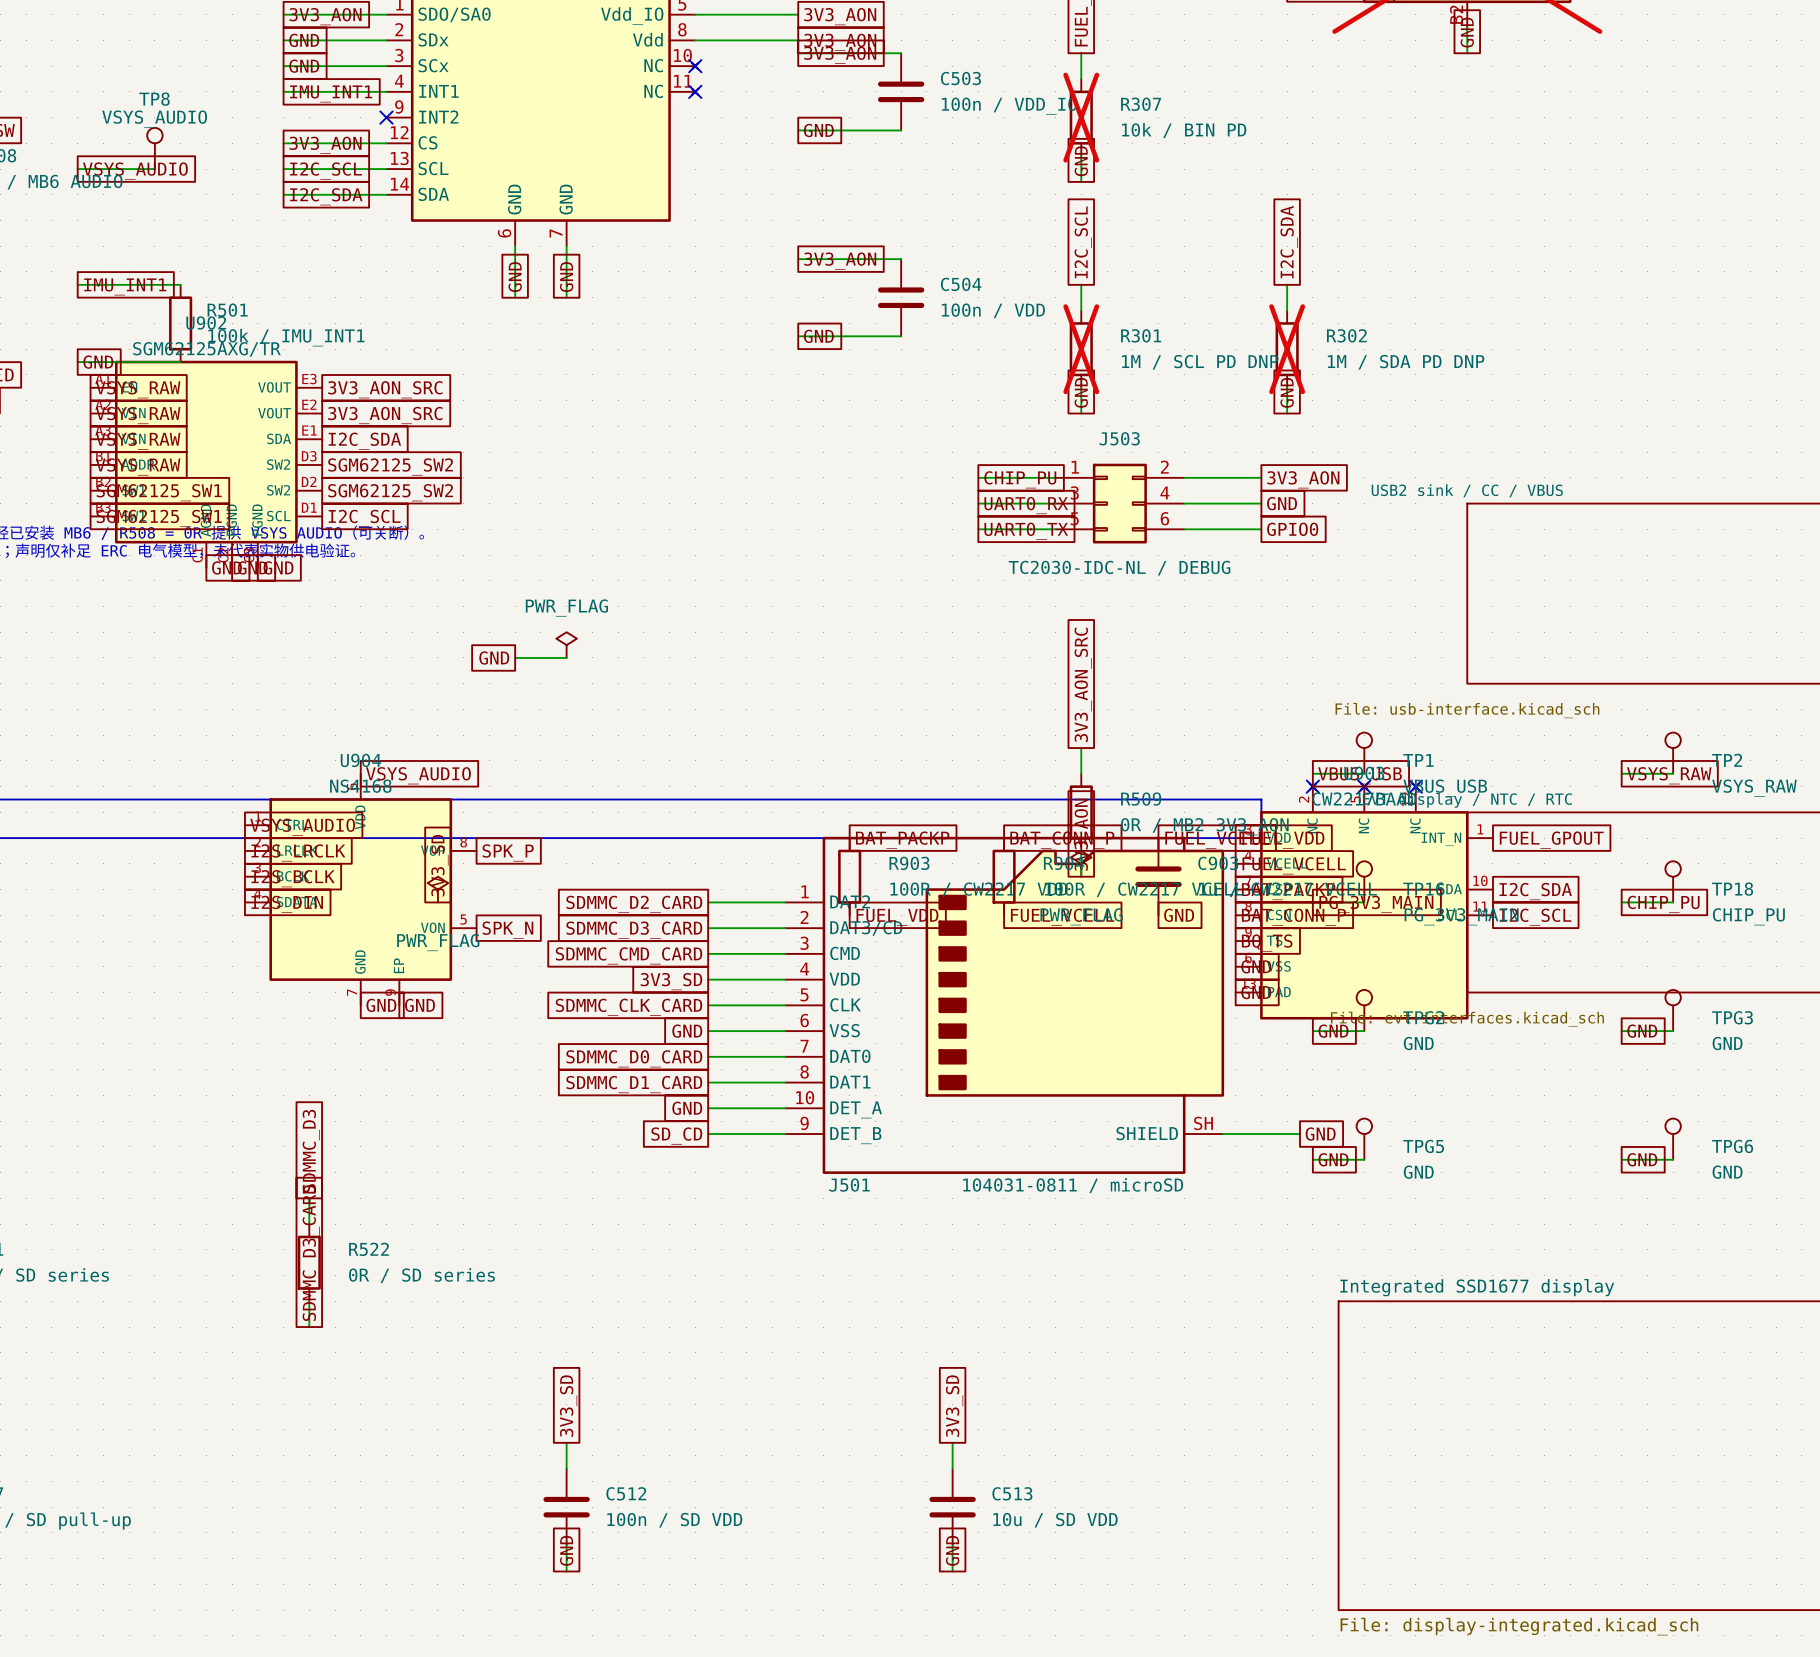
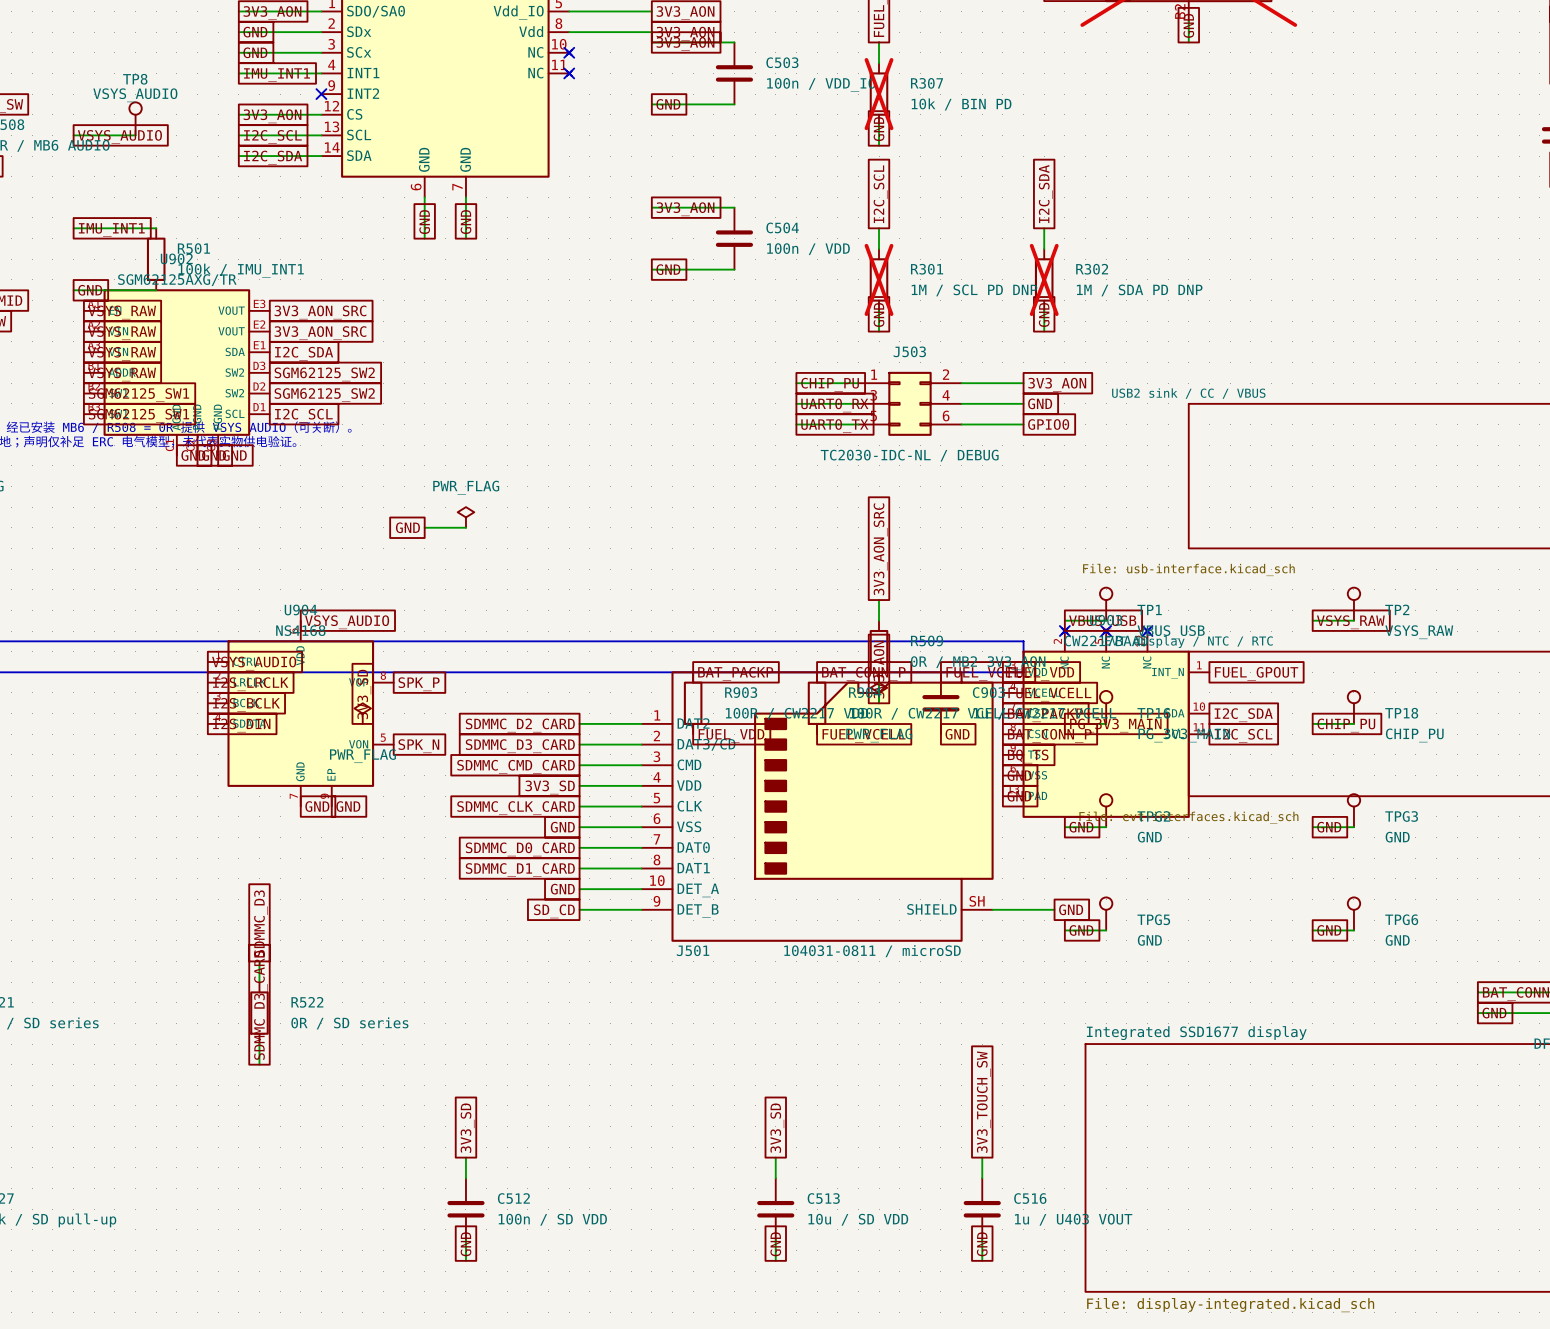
global label: none -> 3V3_TOUCH_SW (983, 1102)
wire: none -> (982, 1157) (982, 1178)
C516: none -> 1u / U403 VOUT (982, 1209)
wire: none -> (982, 1240) (982, 1260)
global label: none -> GND (982, 1244)

